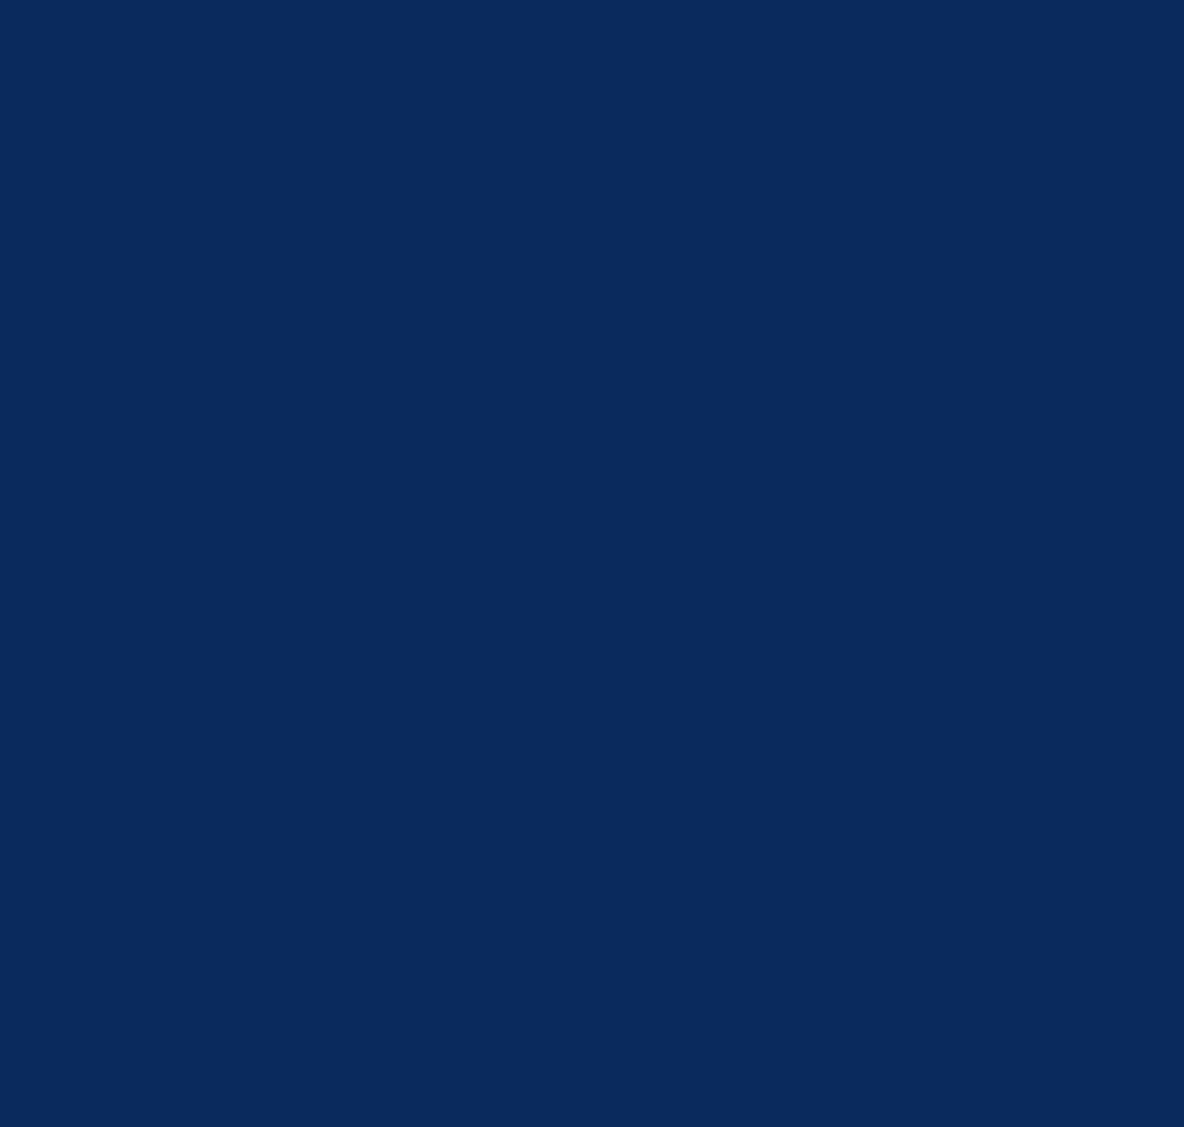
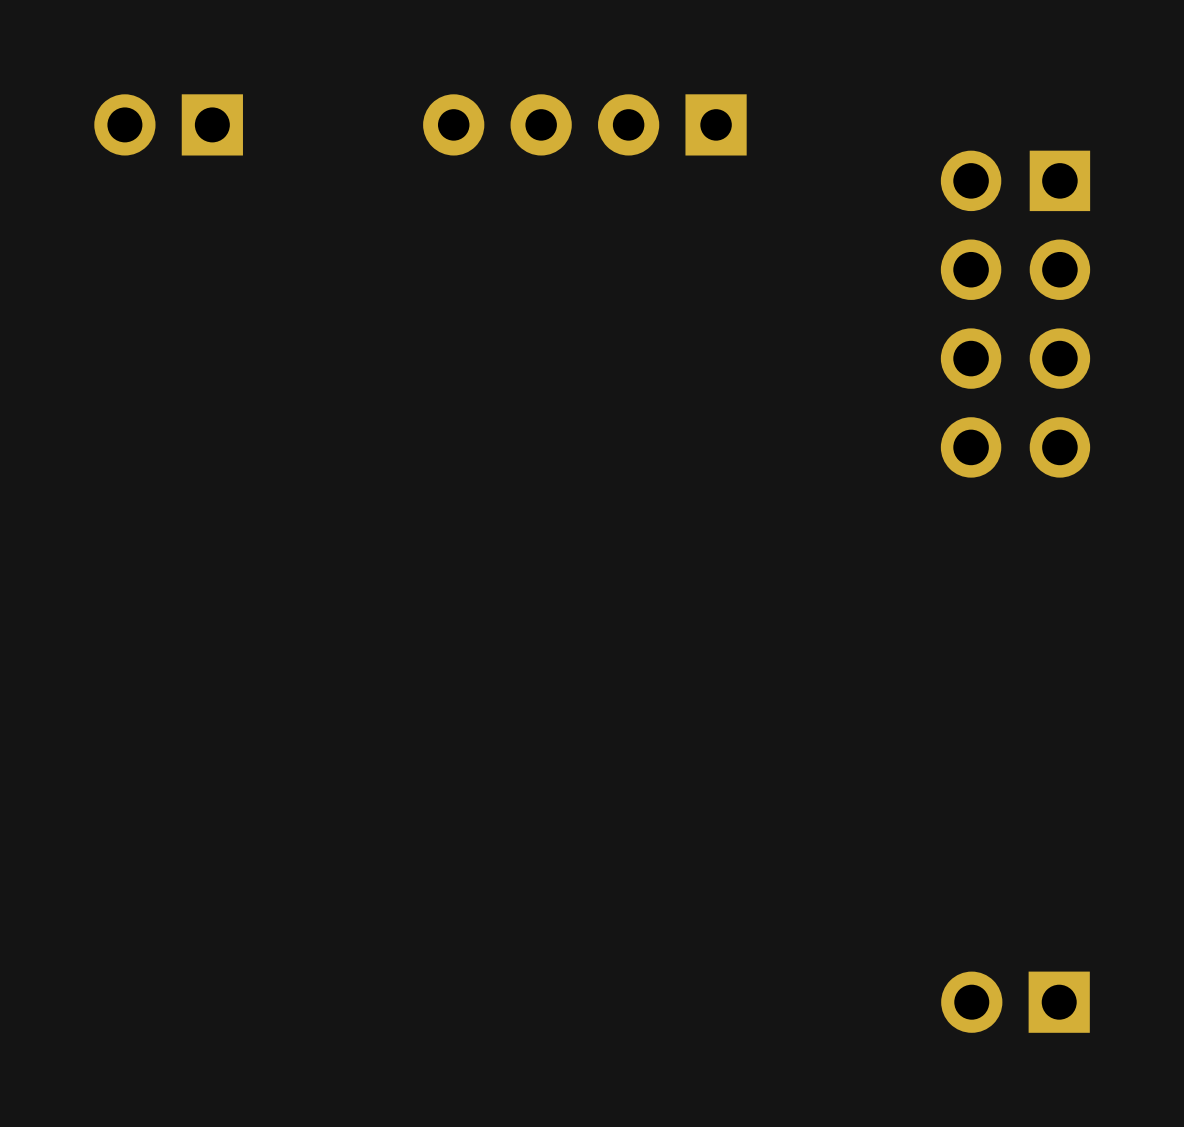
part: none -> (168, 124)
part: none -> (584, 124)
part: none -> (1015, 314)
part: none -> (1015, 1002)

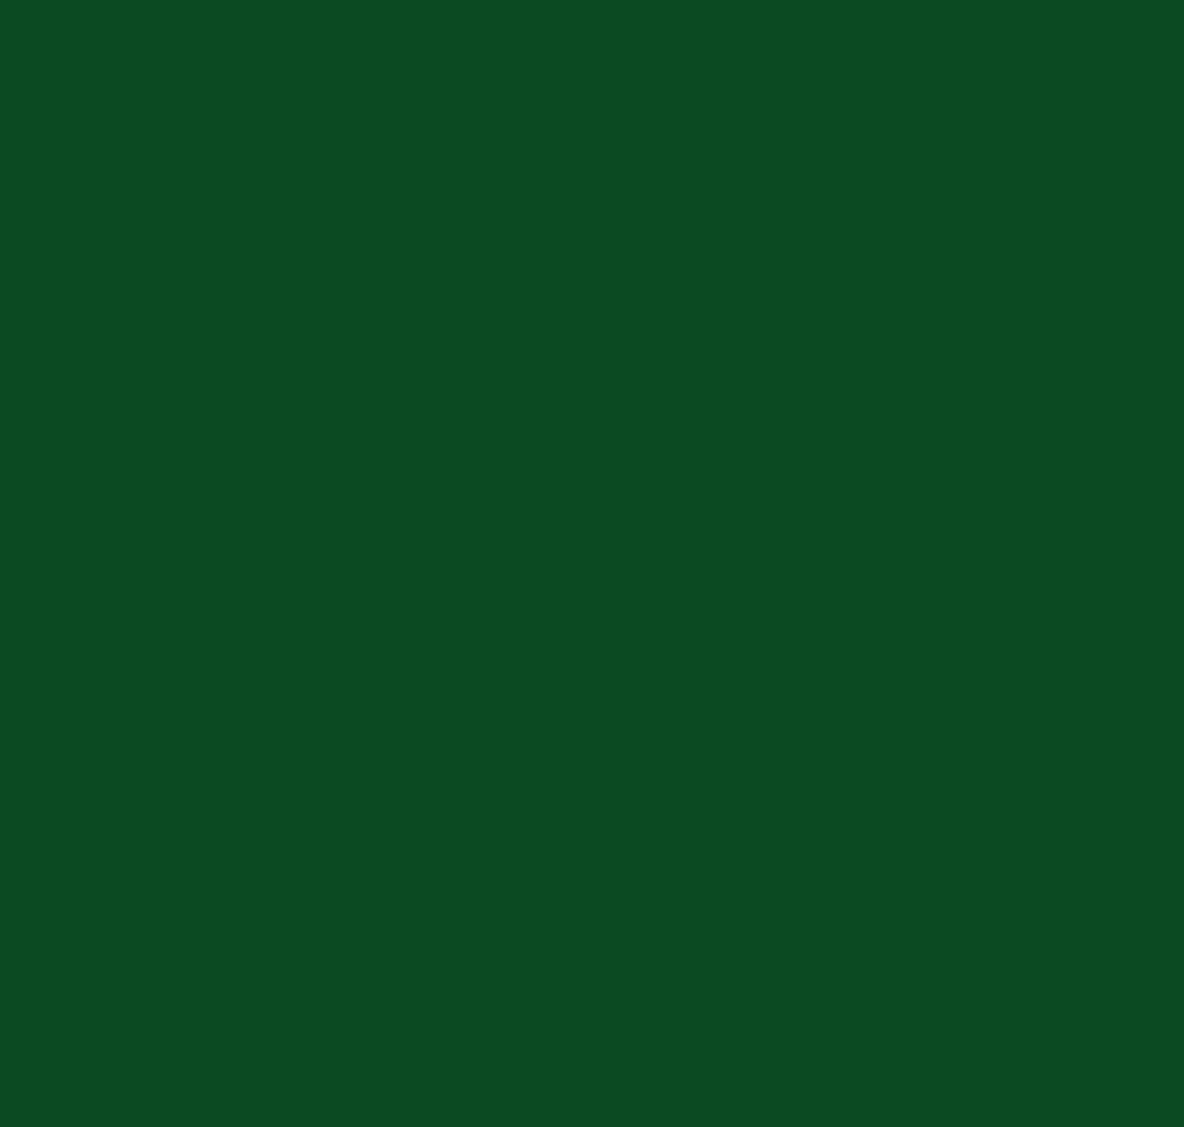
part: (168, 124) -> none
part: (584, 124) -> none
part: (1015, 314) -> none
part: (1015, 1002) -> none

